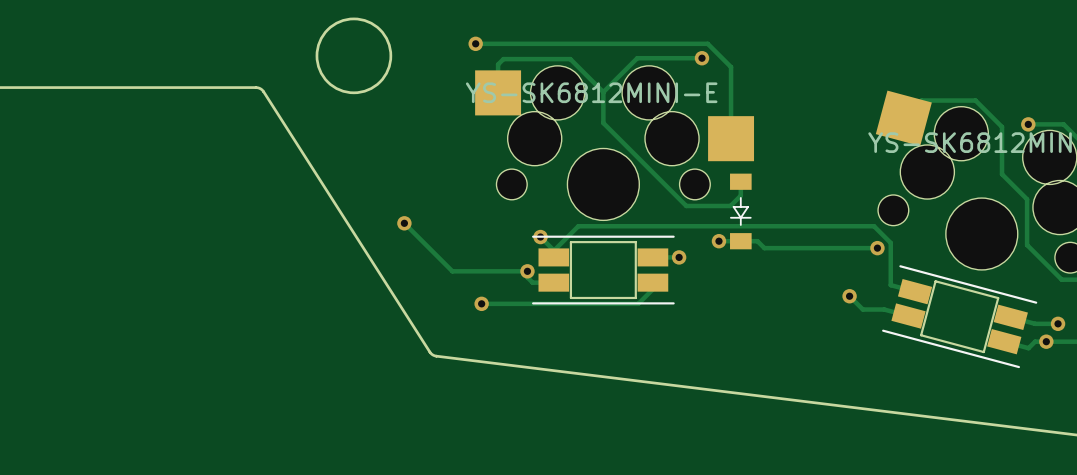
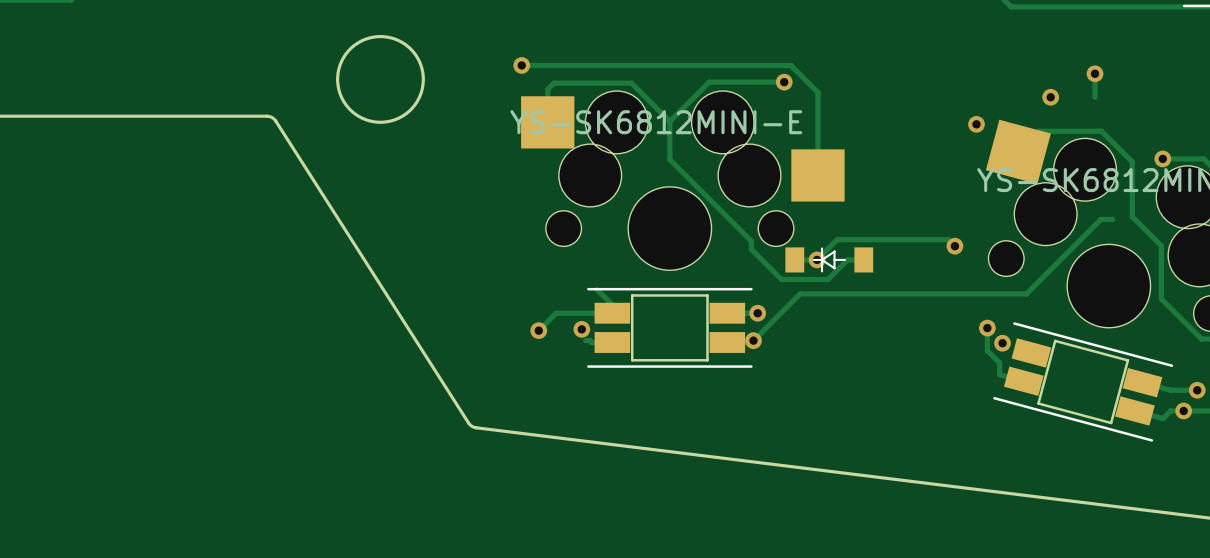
track: none -> (1095, 73) (1095, 97)
via: none -> (1095, 73)
via: none -> (1050, 97)
via: none -> (976, 124)
track: (603, 123) (686, 205) (730, 205) (740, 195) (740, 181) -> (669, 157) (669, 159) (751, 241) (751, 249) (781, 279) (828, 279) (847, 259) (863, 259)
track: none -> (1112, 219) (1101, 219) (1026, 293) (800, 293) (753, 340) (725, 342)
track: none -> (954, 246) (948, 239) (837, 239) (817, 259) (794, 259)
via: none -> (954, 246)
via: none -> (817, 259)
part rotation: 0° (740, 211) -> 90° clockwise (829, 259)
track: (404, 223) (452, 271) (527, 271) (527, 277) (532, 282) (536, 282) -> (585, 340) (591, 342)
via: (404, 223) -> none
via: (540, 237) -> none
track: (718, 241) (757, 241) (764, 248) (877, 248) -> none
via: (718, 241) -> none
via: (877, 248) -> none
track: (553, 257) (553, 250) (578, 226) (874, 226) (890, 242) (890, 285) (915, 291) -> none
track: none -> (614, 313) (556, 313) (538, 330)
track: none -> (987, 328) (987, 350) (999, 363) (999, 374) (1025, 381)
via: none -> (987, 328)
via: none -> (538, 330)
via: none -> (753, 340)
track: (652, 282) (652, 289) (638, 303) (481, 303) -> none
via: none -> (1002, 343)
track: (849, 296) (862, 309) (884, 309) (908, 316) -> none
via: (849, 296) -> none
via: (481, 303) -> none

